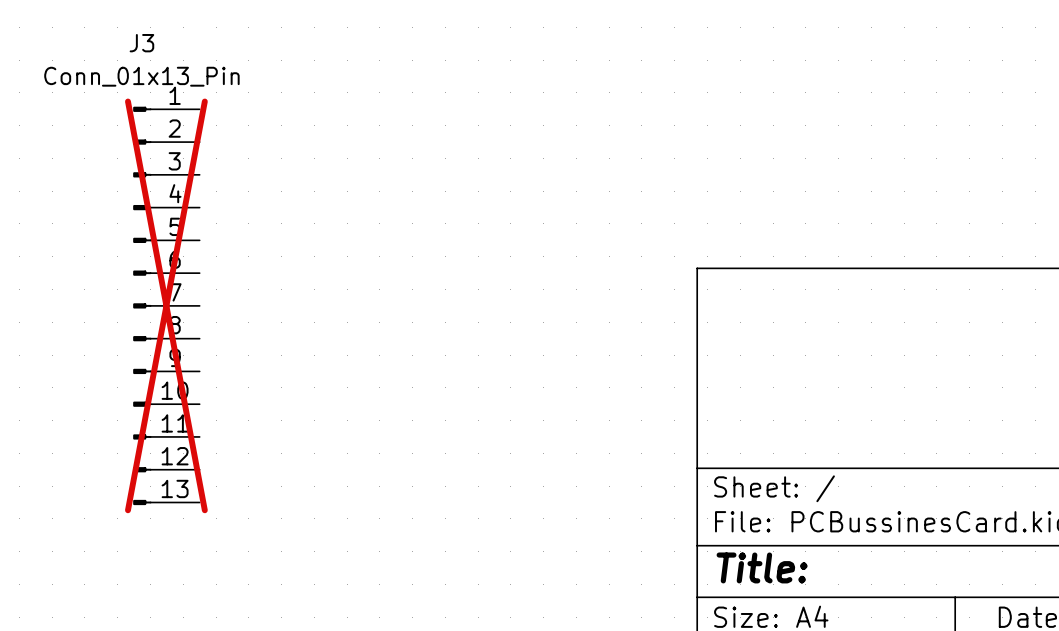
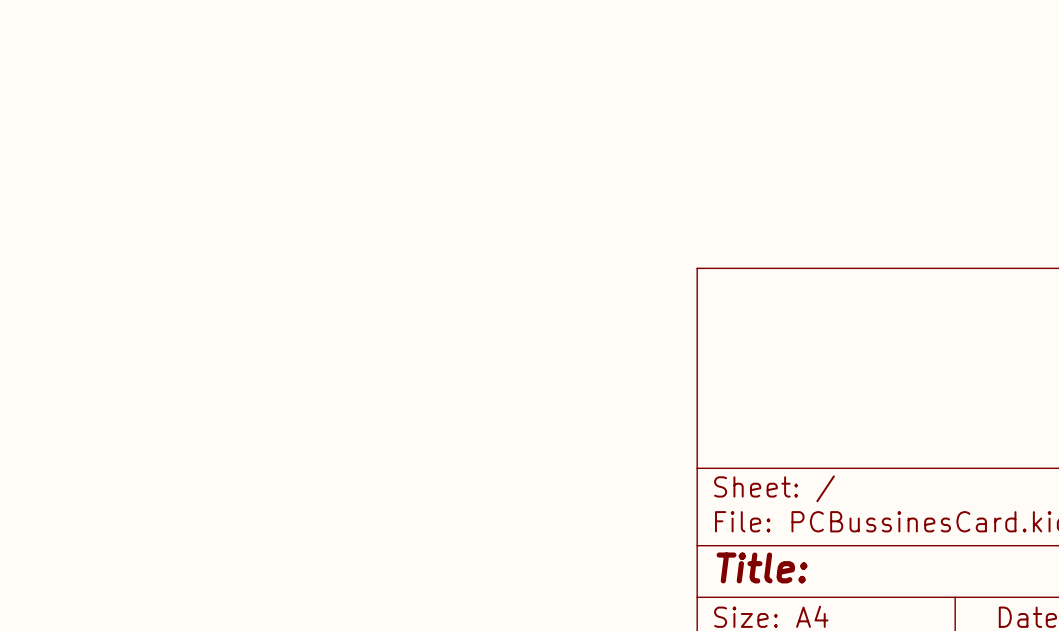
J3: Conn_01x13_Pin (166, 305) -> none

